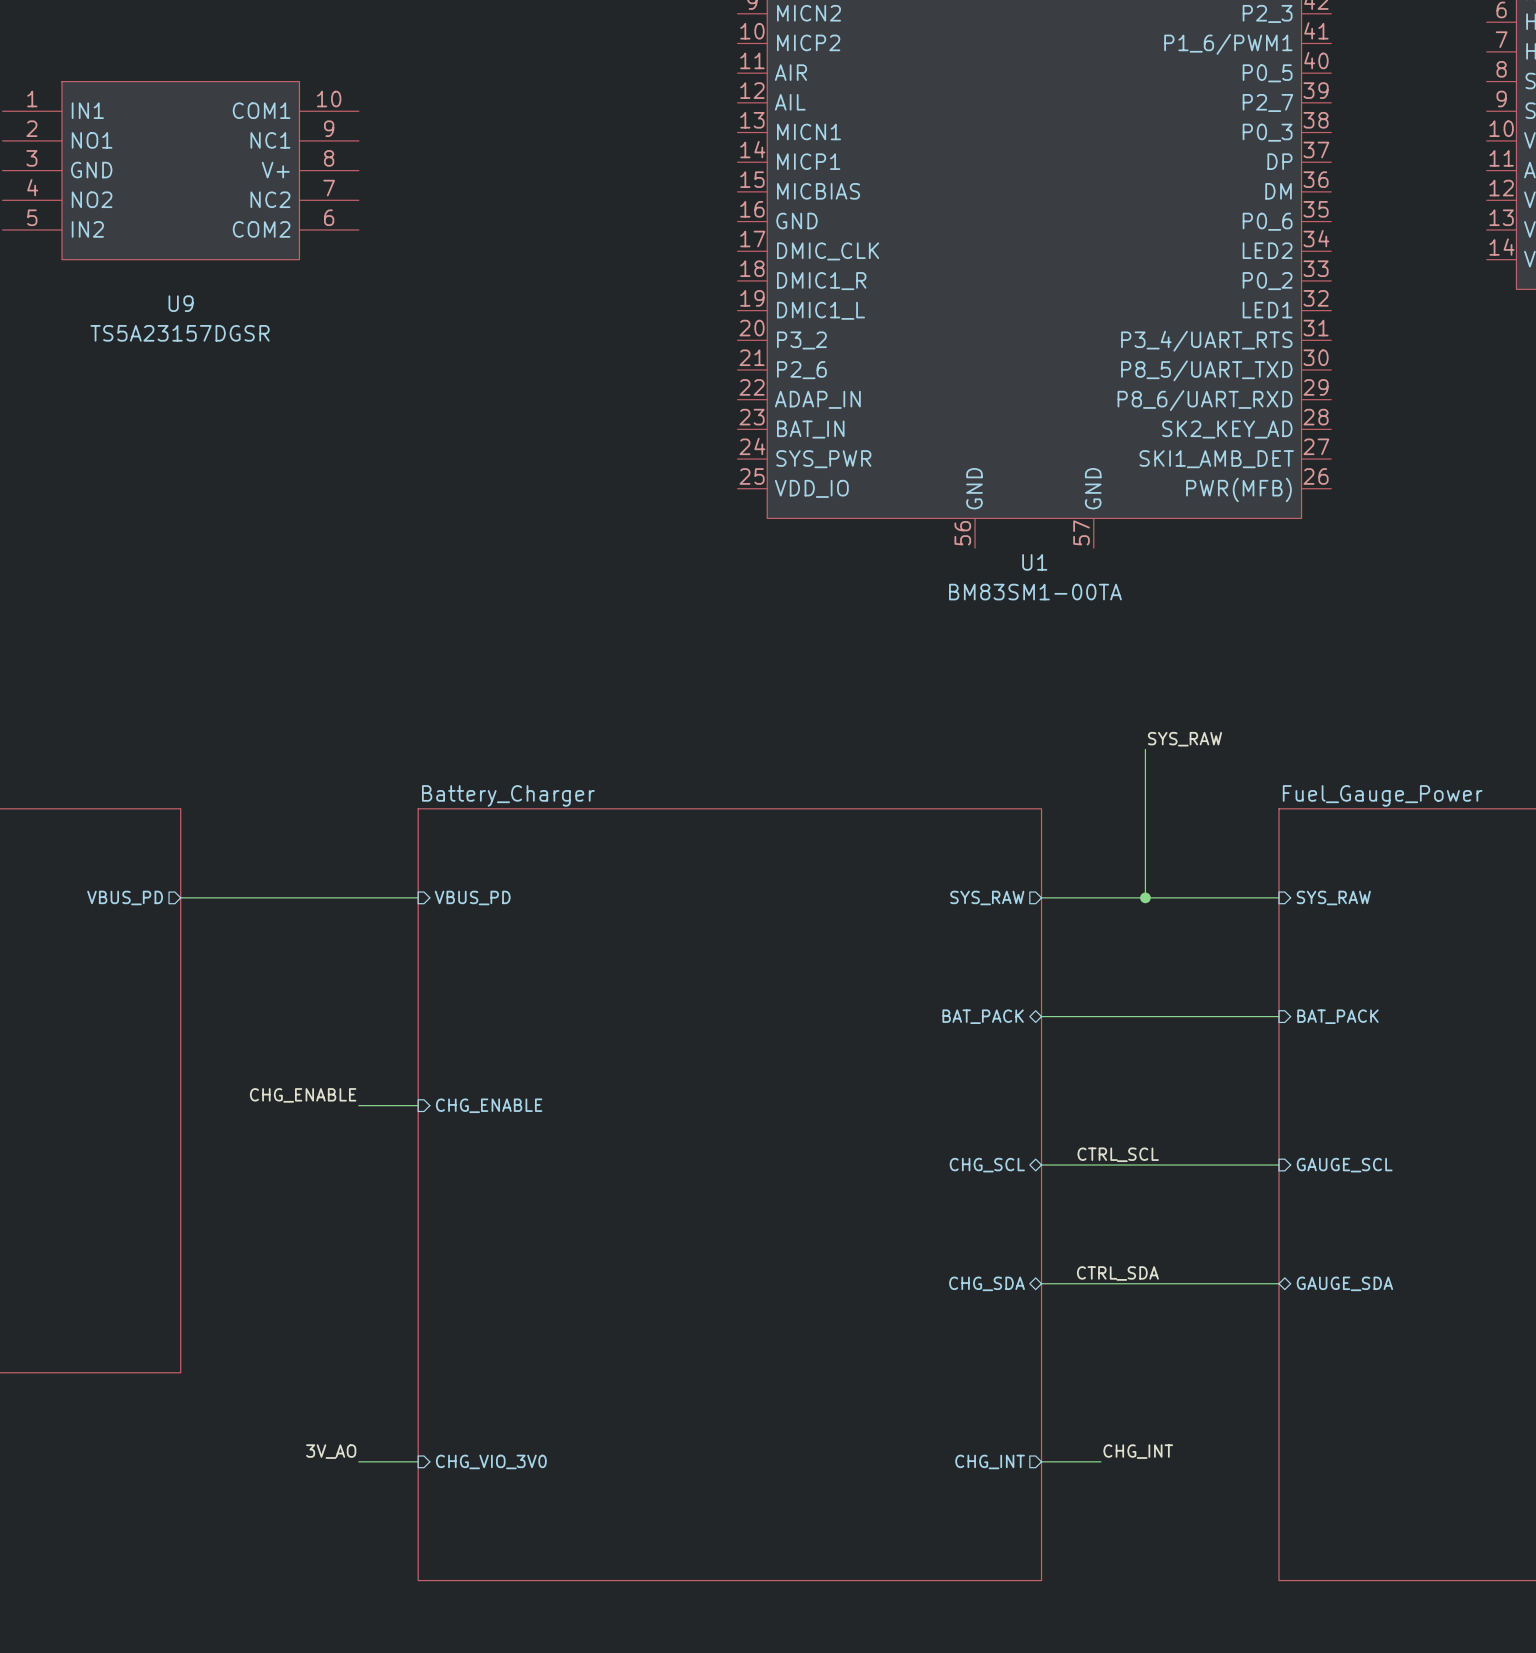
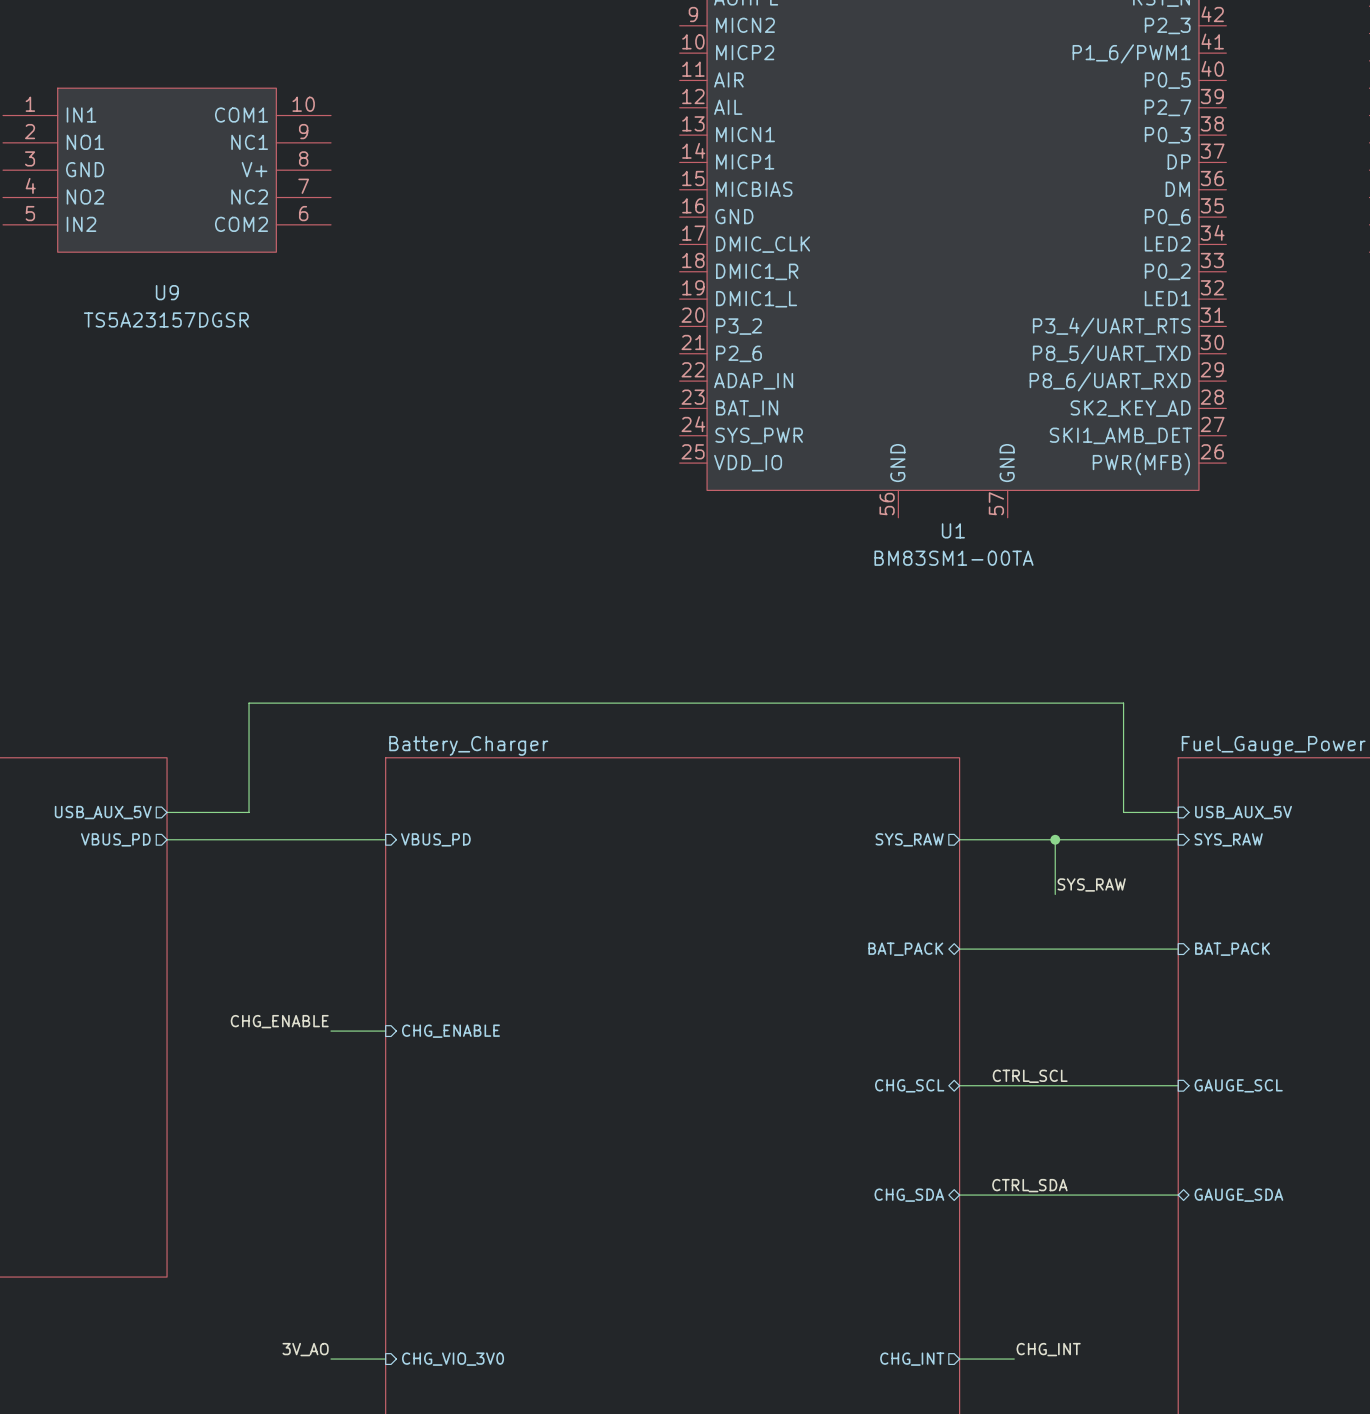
label position: SYS_RAW (1184, 739) -> SYS_RAW (1091, 884)
wire: (1145, 749) (1145, 897) -> (1055, 894) (1055, 839)
sheet pin: none -> USB_AUX_5V (103, 812)
wire: none -> (167, 812) (249, 812) (249, 703) (1123, 703) (1123, 812) (1178, 812)
sheet pin: none -> USB_AUX_5V (1243, 812)

